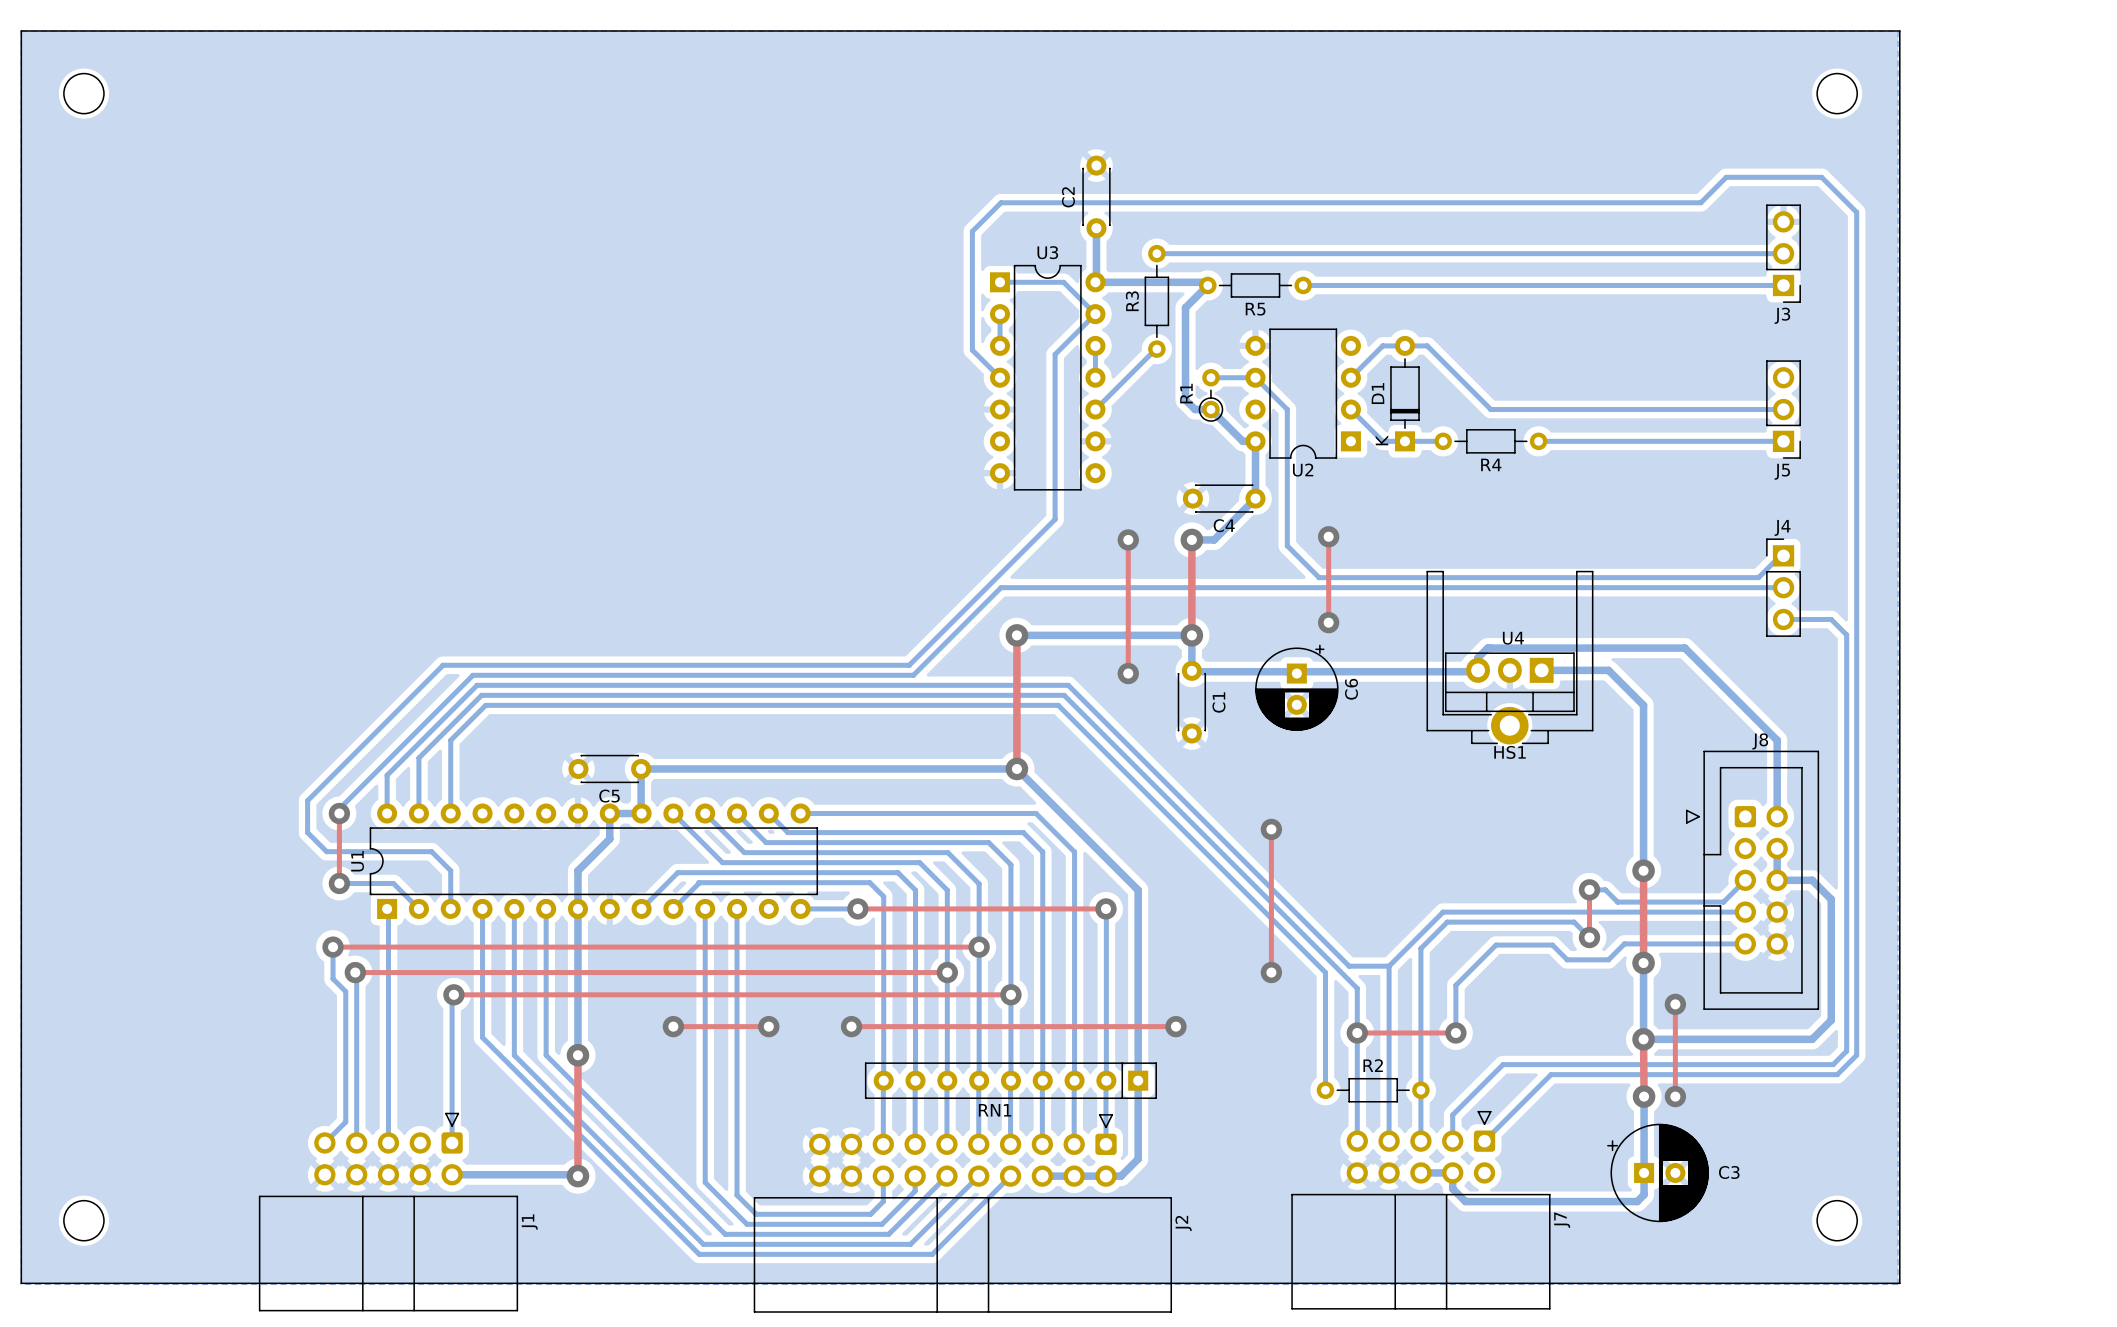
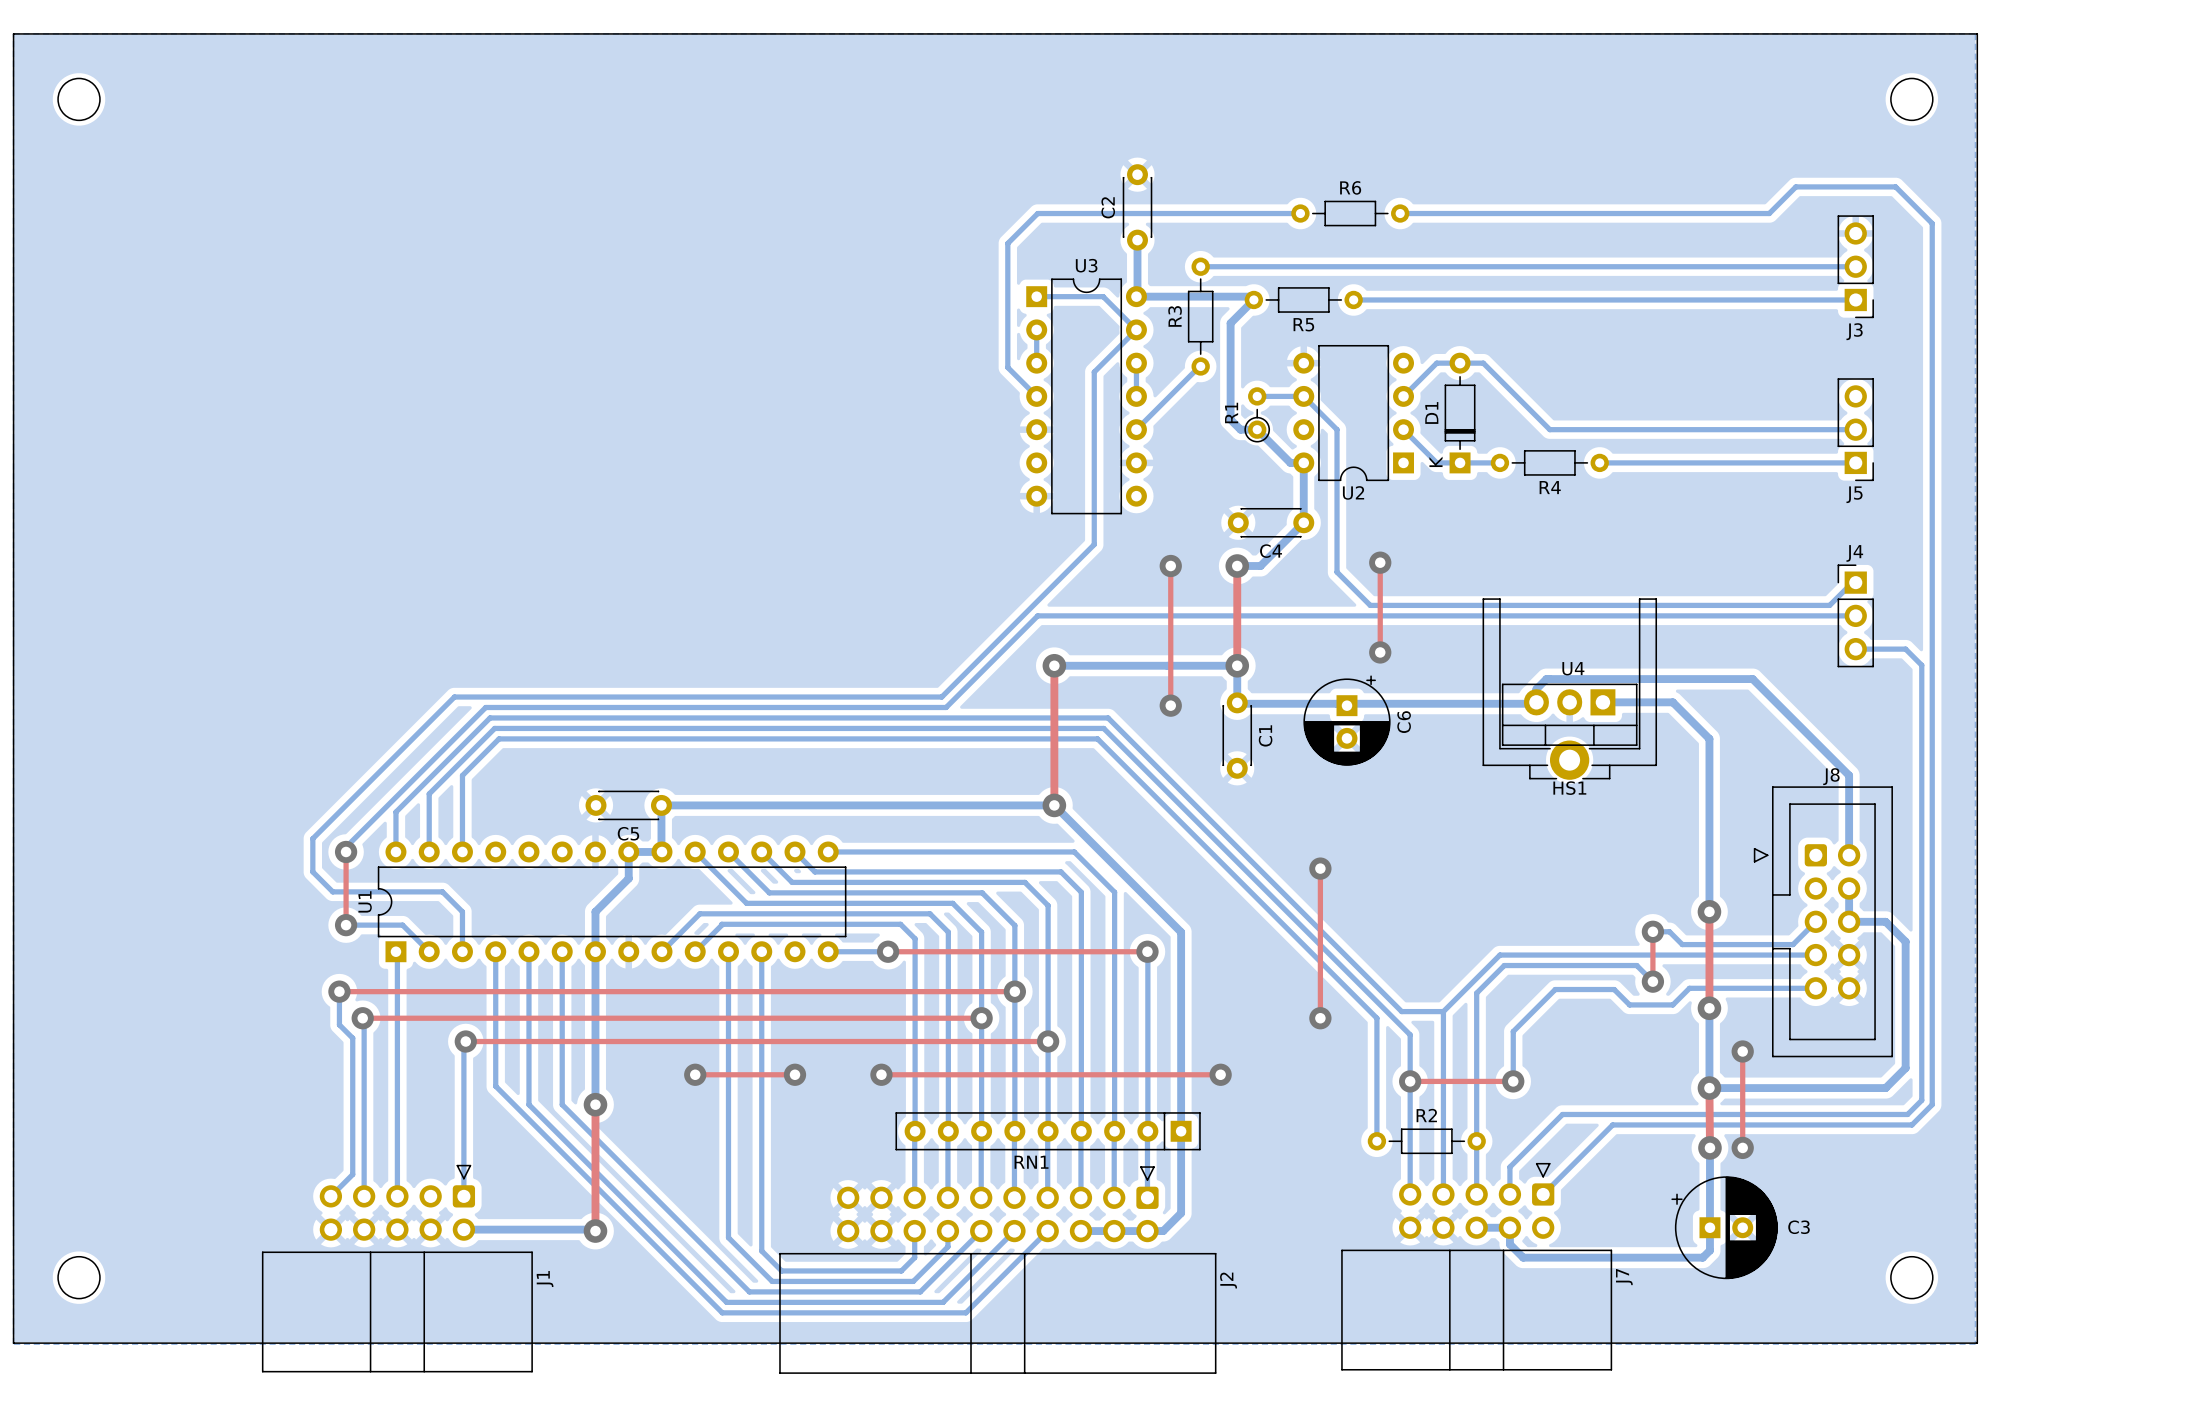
bottom track: (1252, 202) (1347, 202) -> none
R6: none -> (1350, 213)

